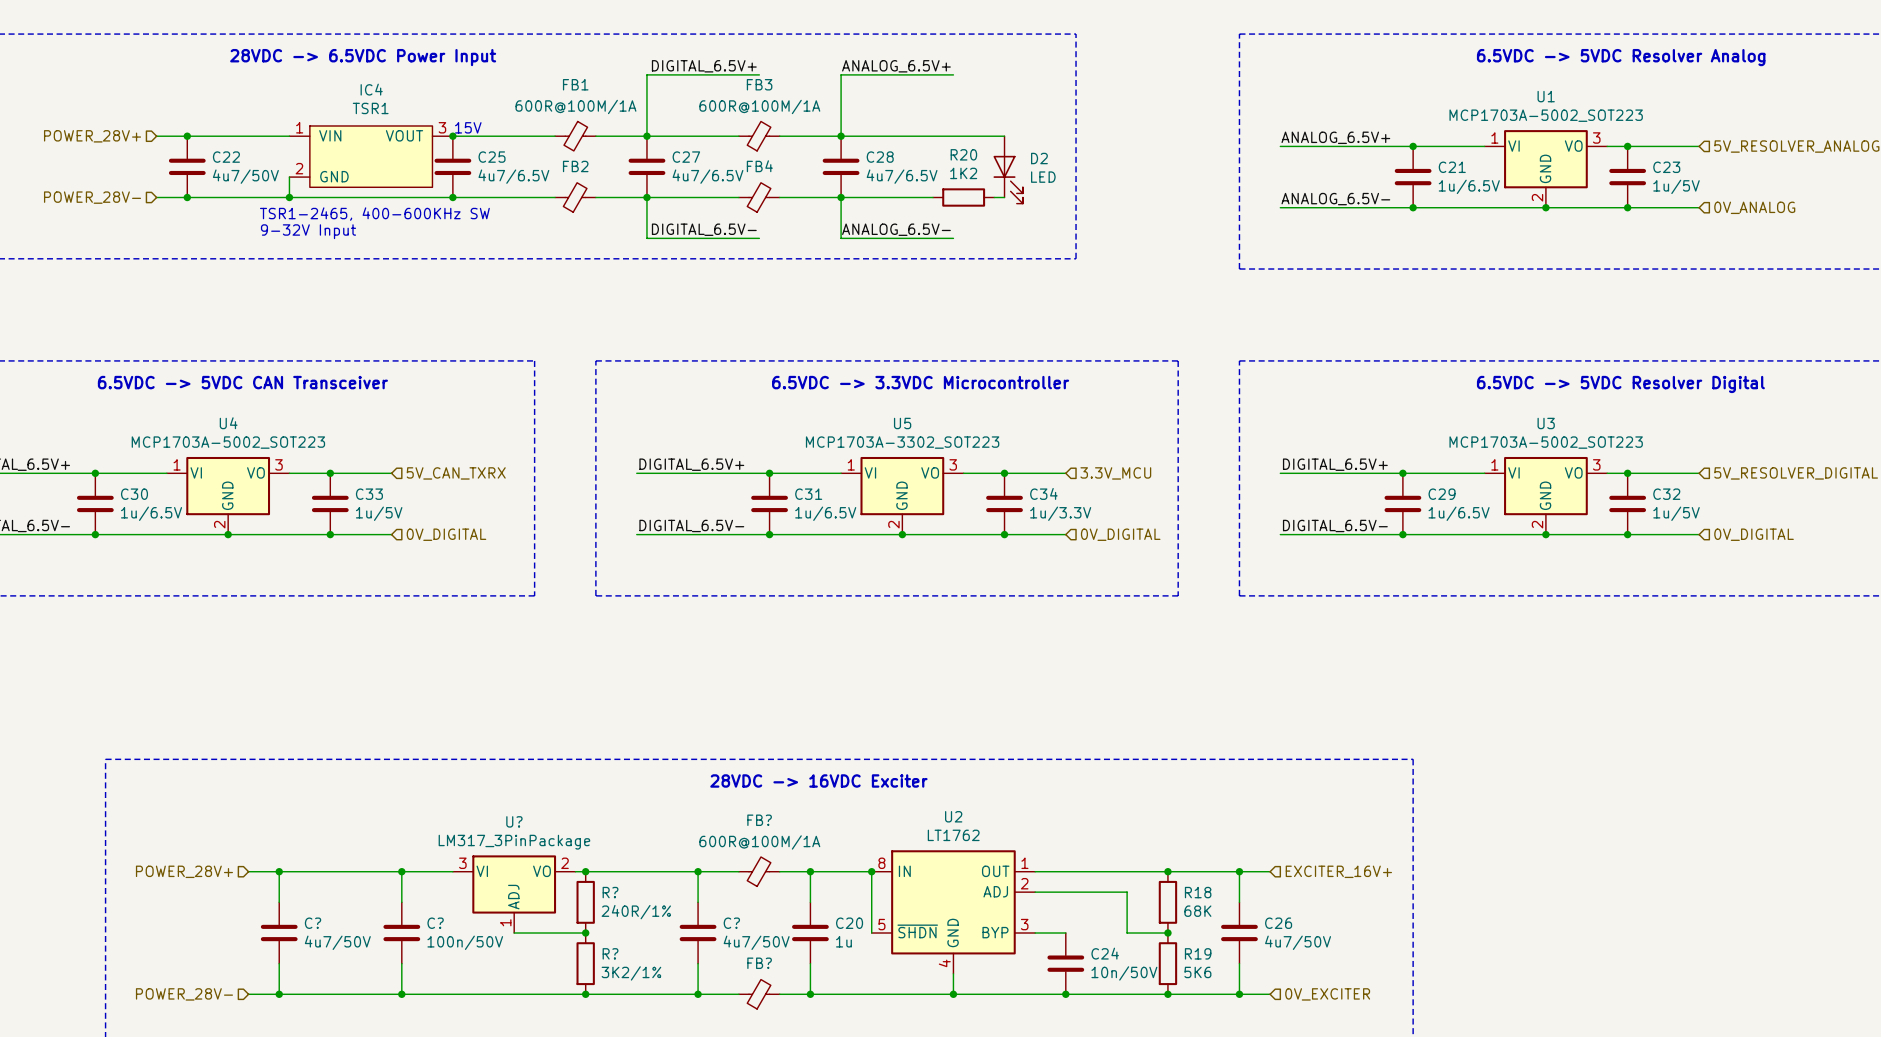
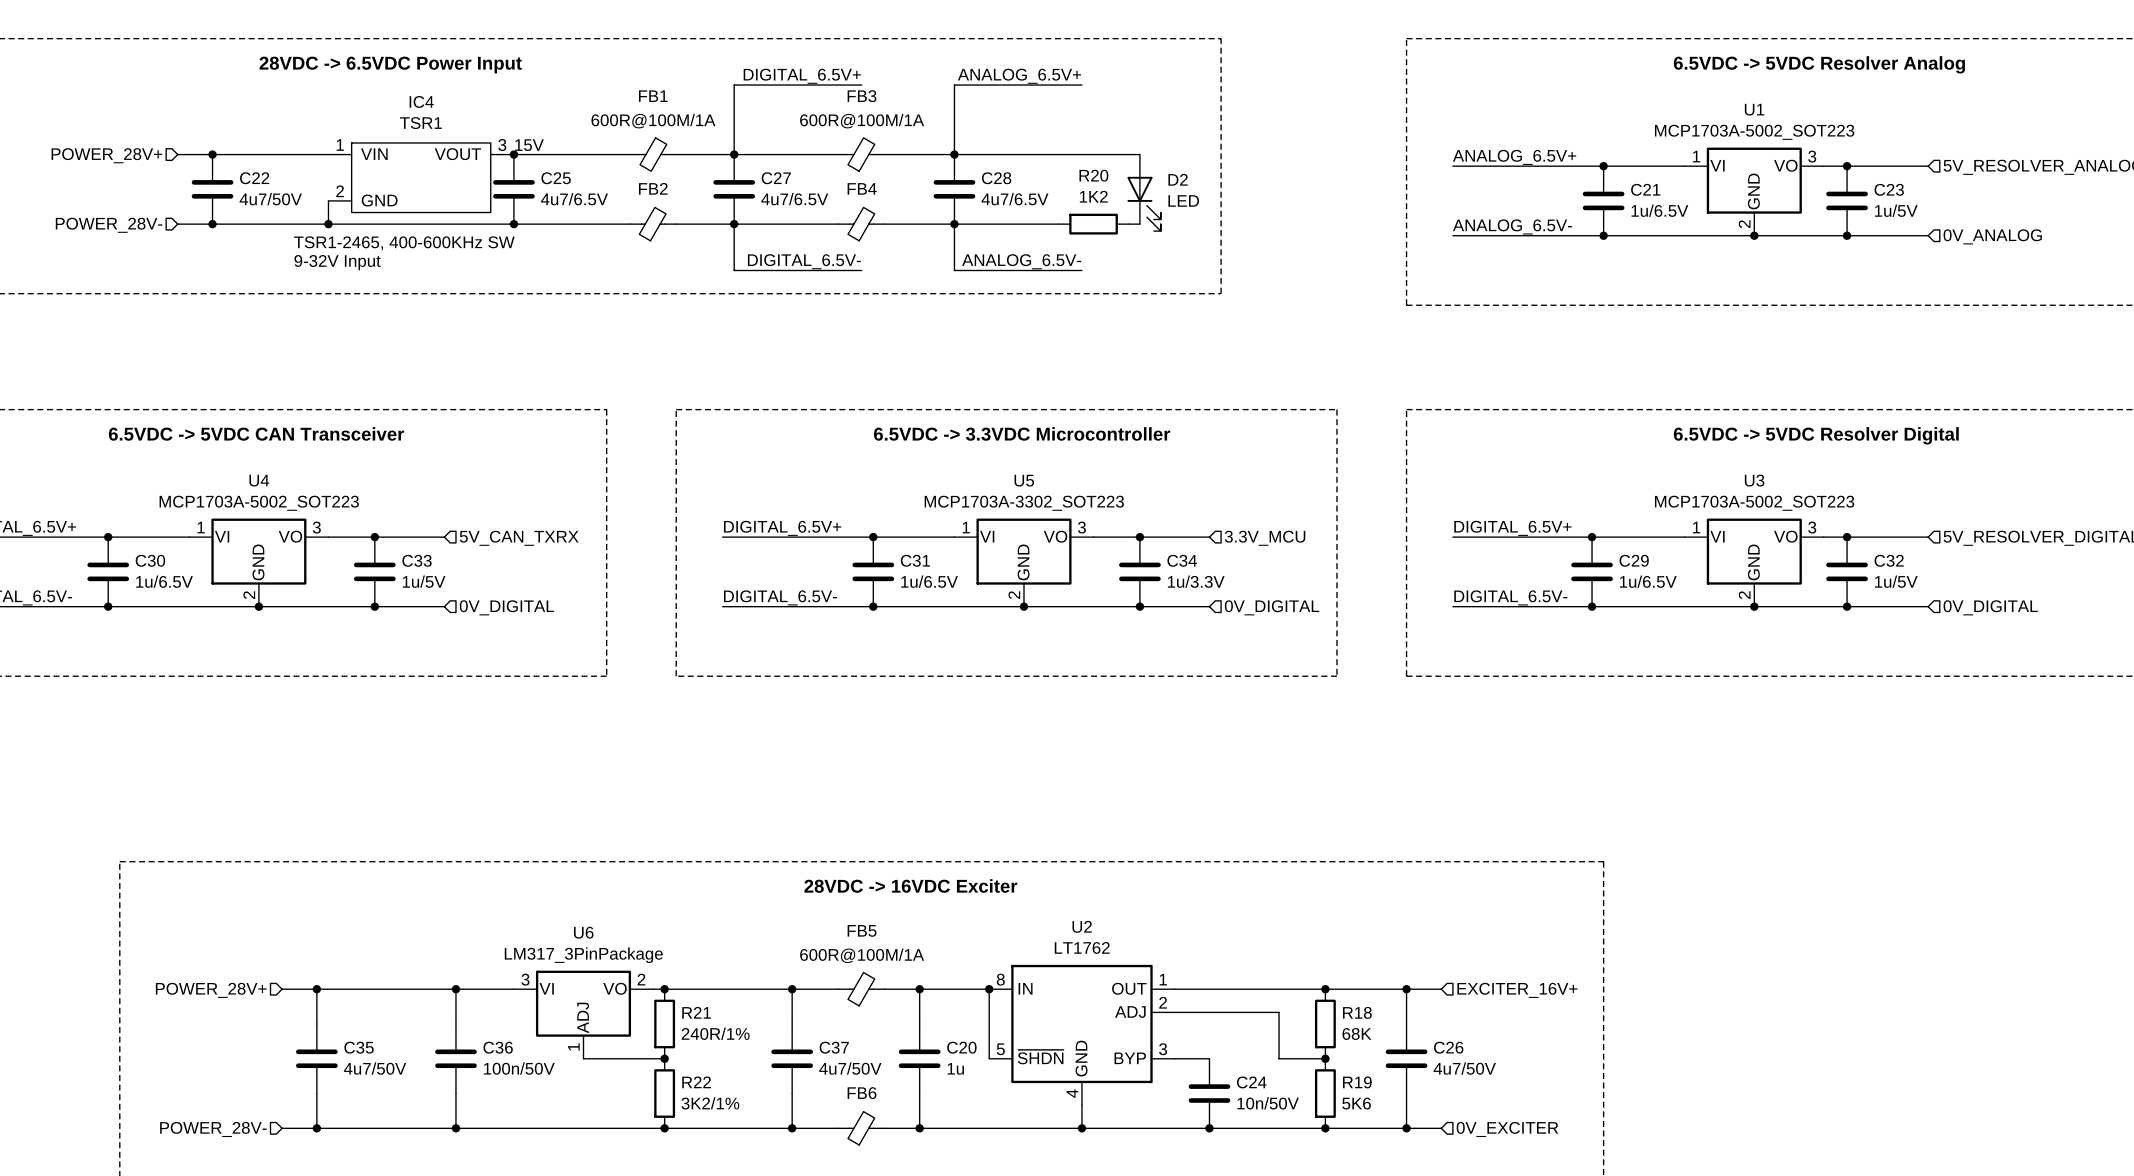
FB? name: FB? (759, 820) -> FB5 (862, 930)
U? name: U? (514, 821) -> U6 (583, 932)
R? name: R? (610, 892) -> R21 (696, 1012)
C? name: C? (313, 923) -> C35 (359, 1047)
C? name: C? (435, 923) -> C36 (498, 1047)
C? name: C? (731, 923) -> C37 (834, 1047)
R? name: R? (610, 953) -> R22 (696, 1082)
FB? name: FB? (759, 963) -> FB6 (862, 1093)

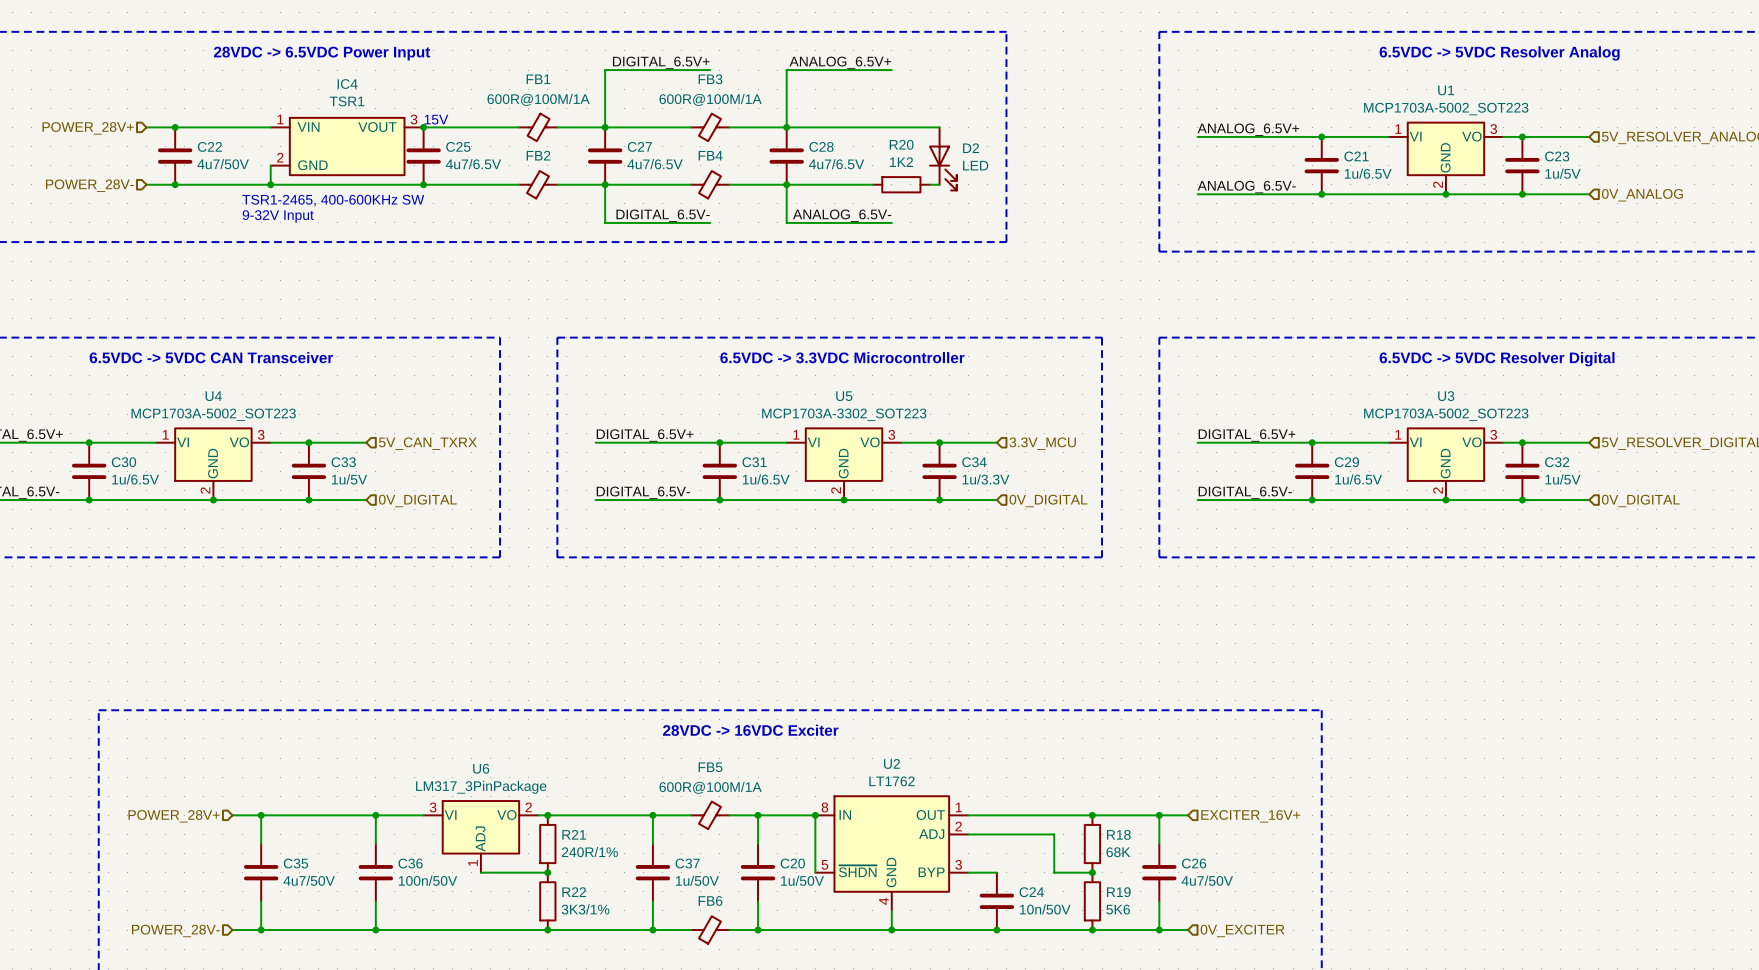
C37 value: 4u7/50V (850, 1068) -> 1u/50V (697, 880)
C20 value: 1u (955, 1068) -> 1u/50V (802, 880)
R22 value: 3K2/1% (710, 1103) -> 3K3/1% (585, 909)

